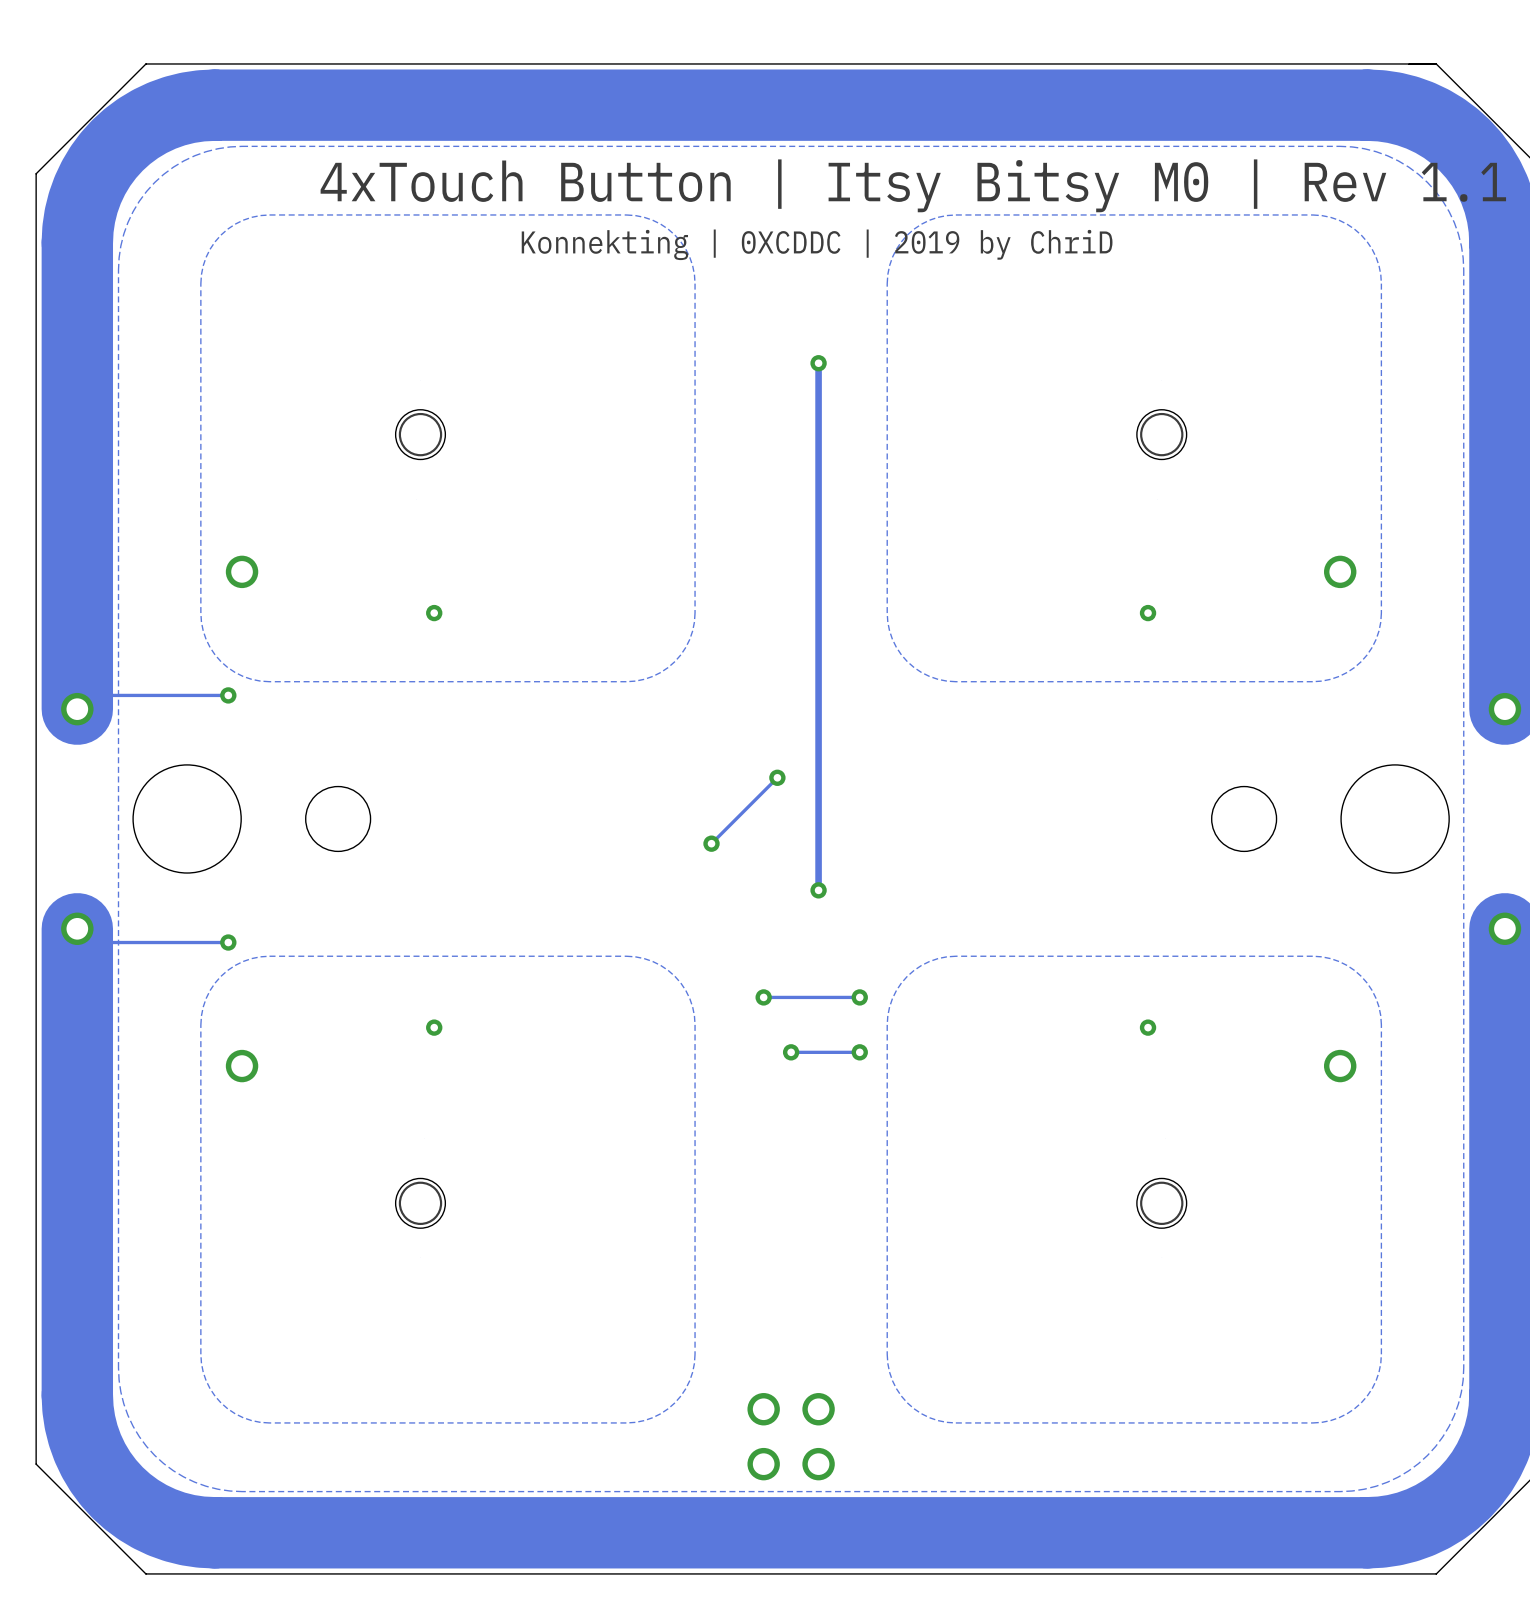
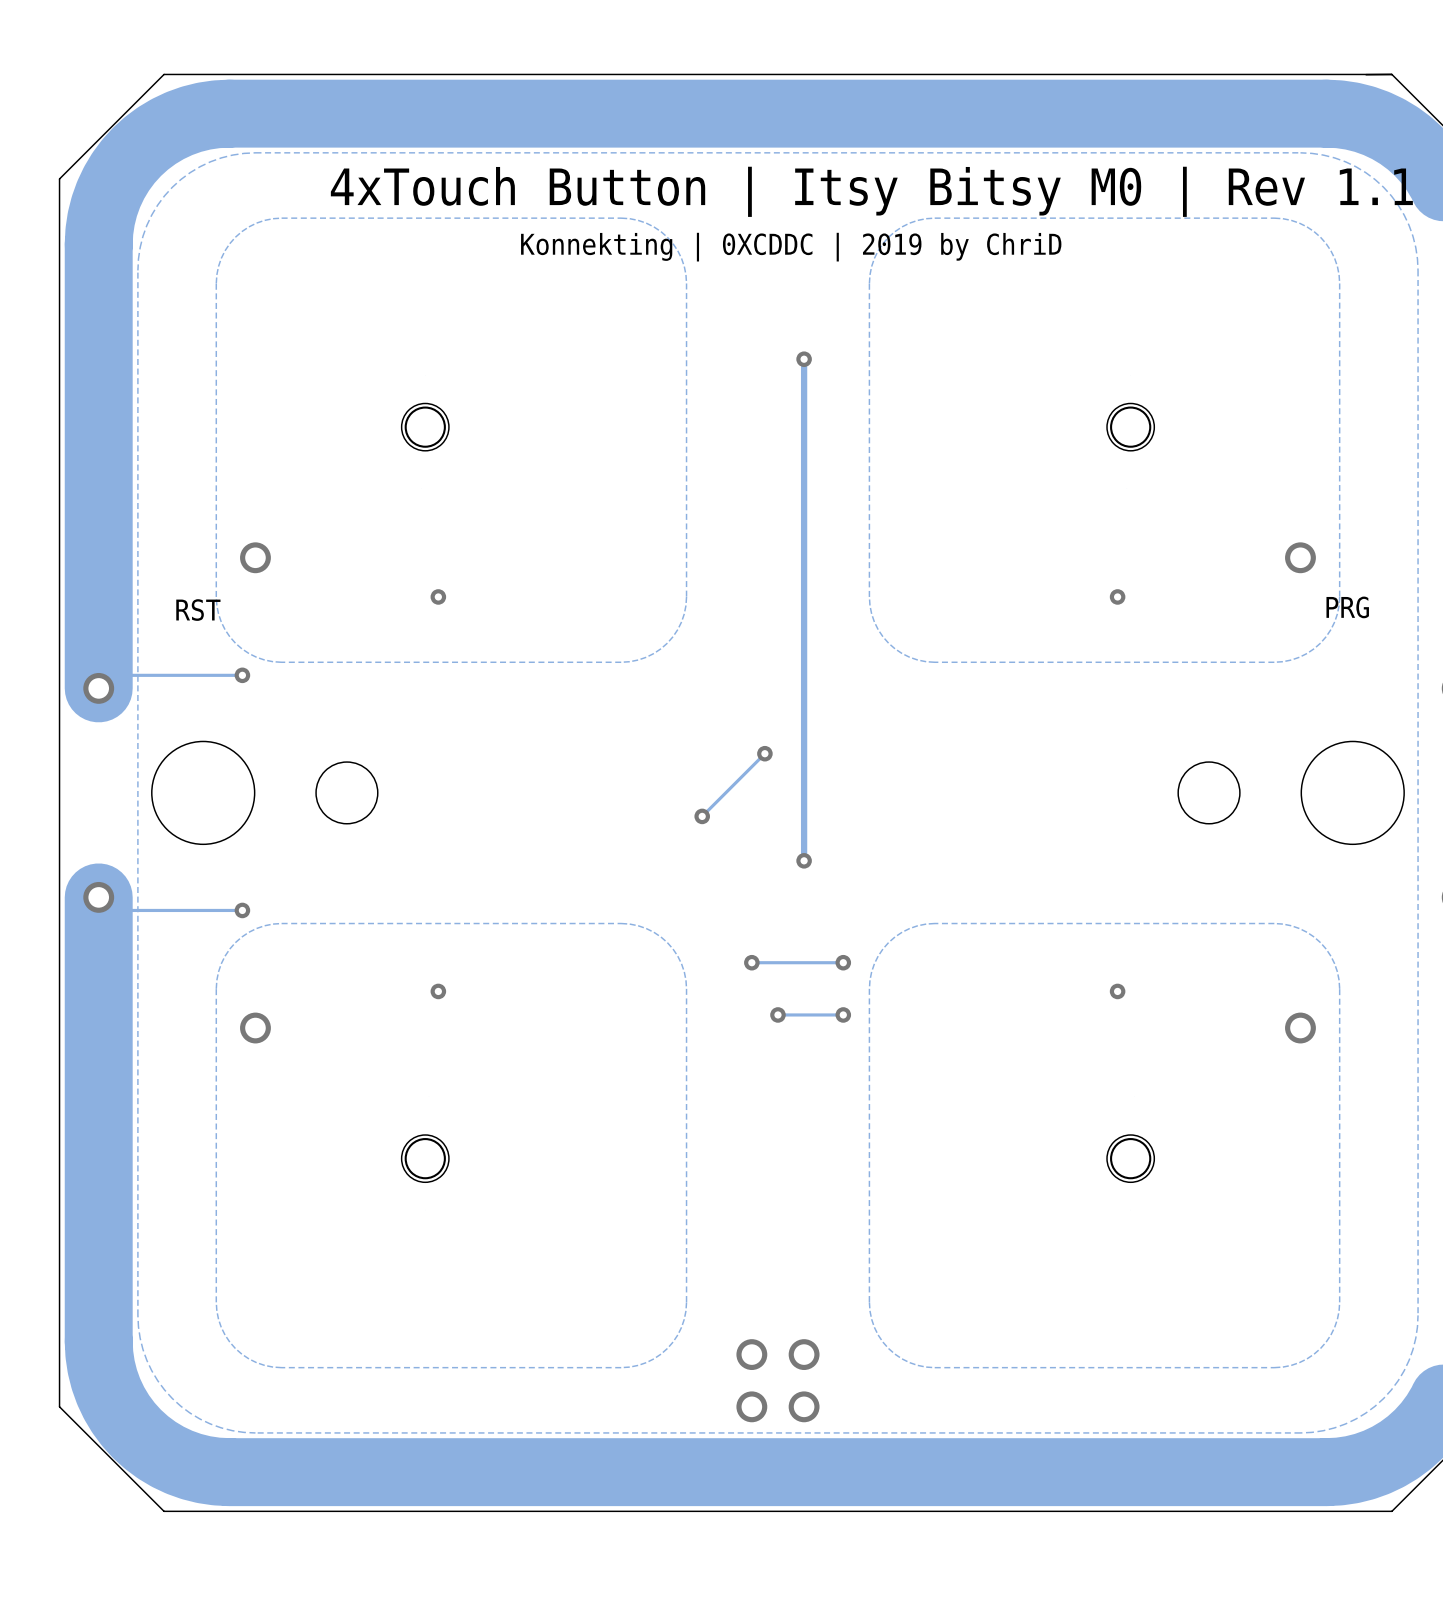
text: none -> PRG (1347, 607)
text: none -> RST (198, 610)

